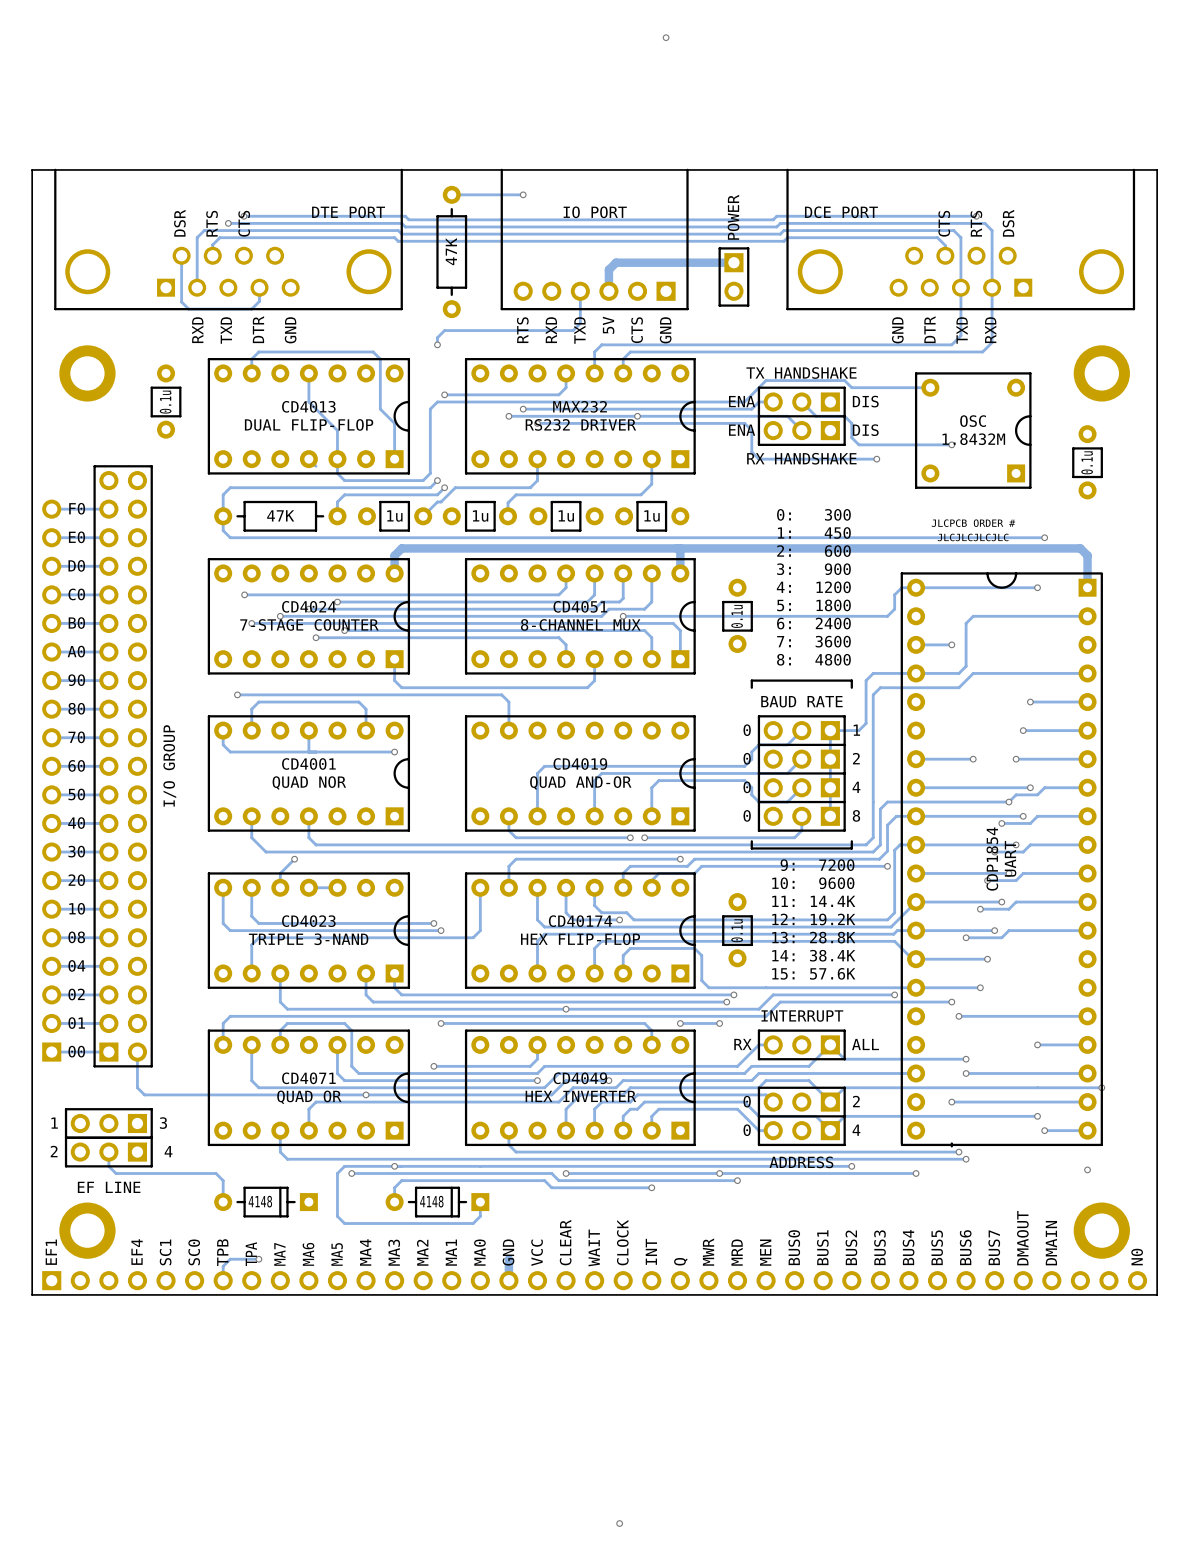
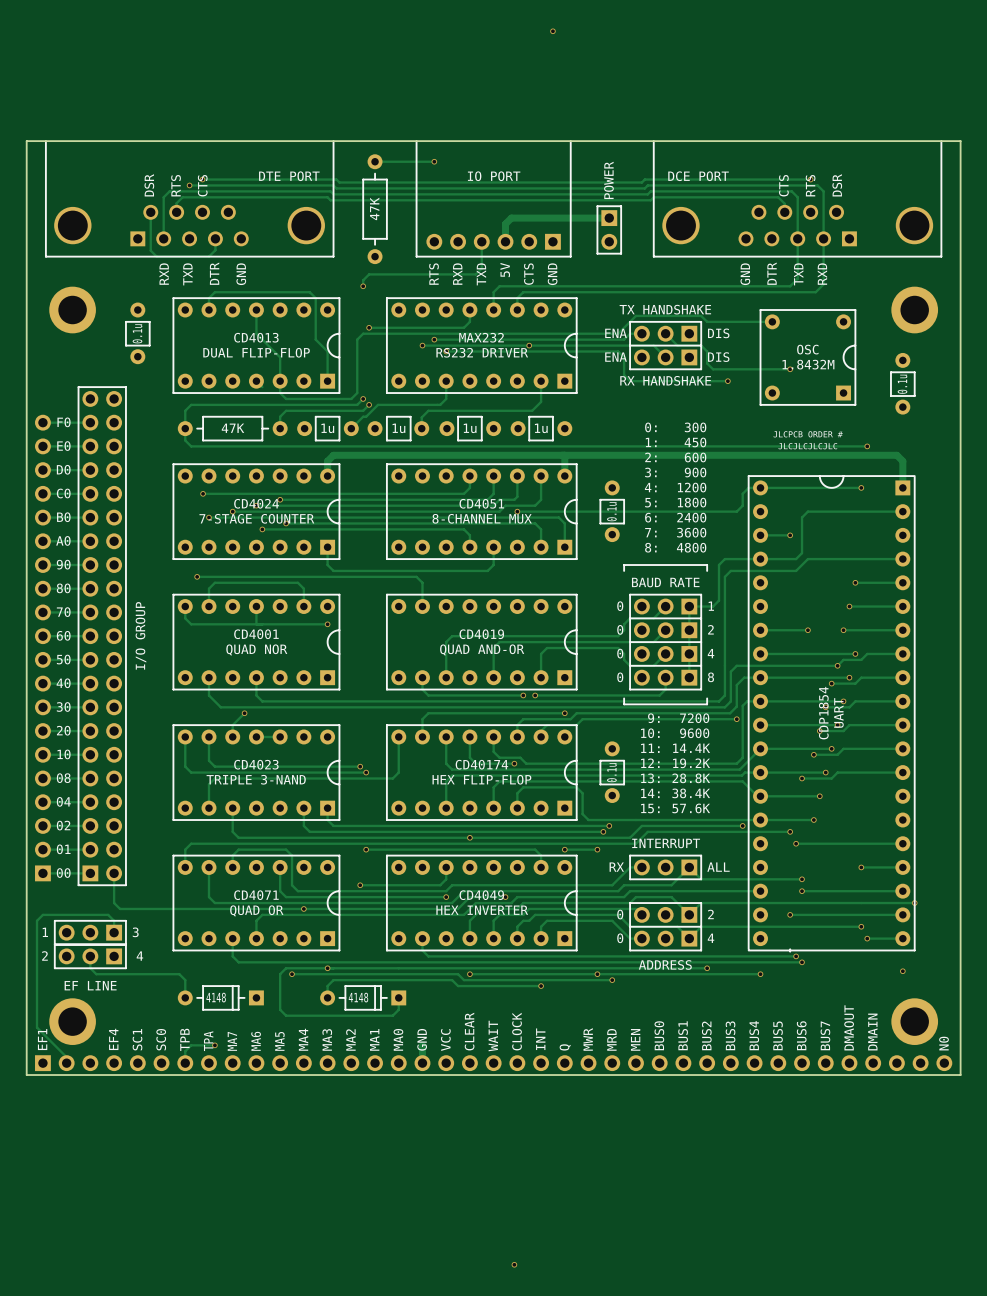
track: none -> (114, 932) (114, 920) (108, 914) (42, 914) (37, 920) (37, 1027) (66, 1057) (66, 1063)

